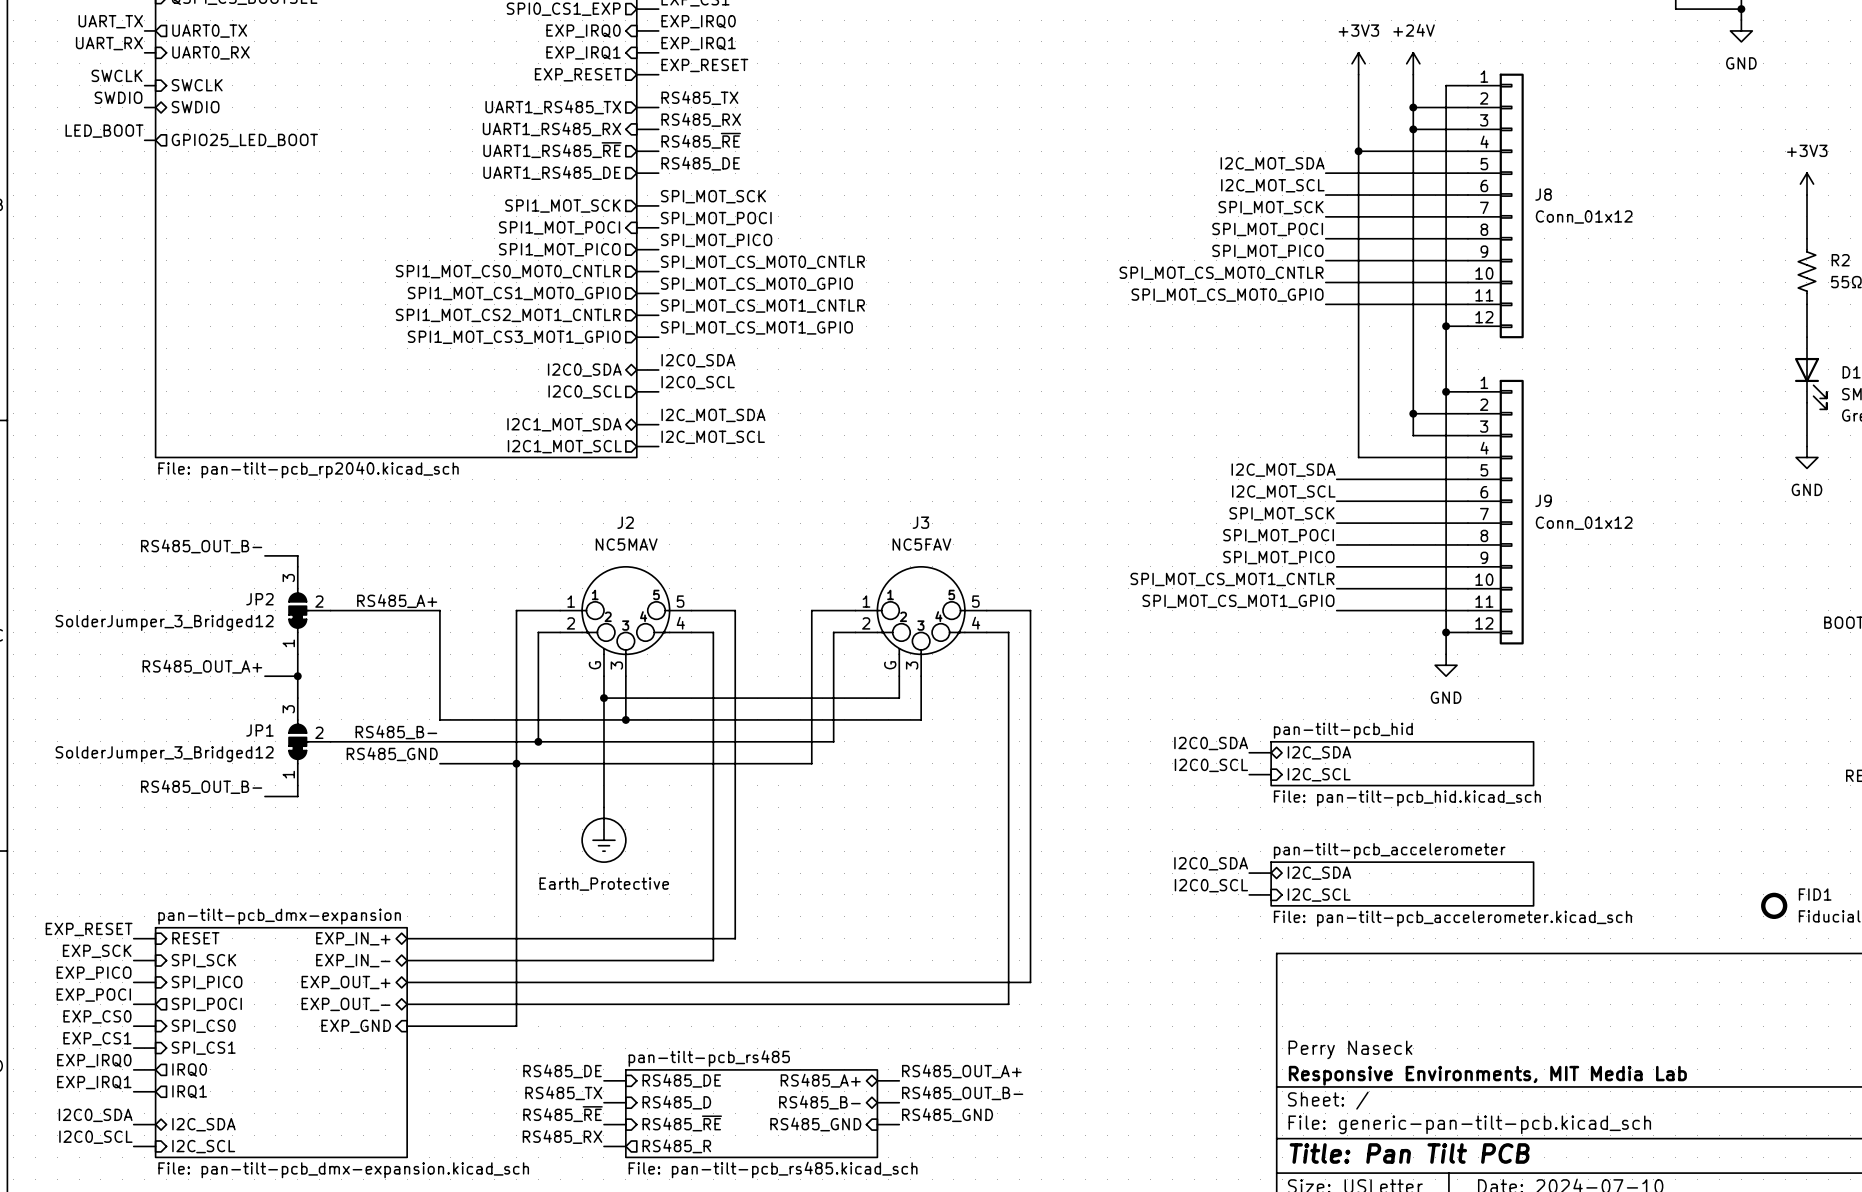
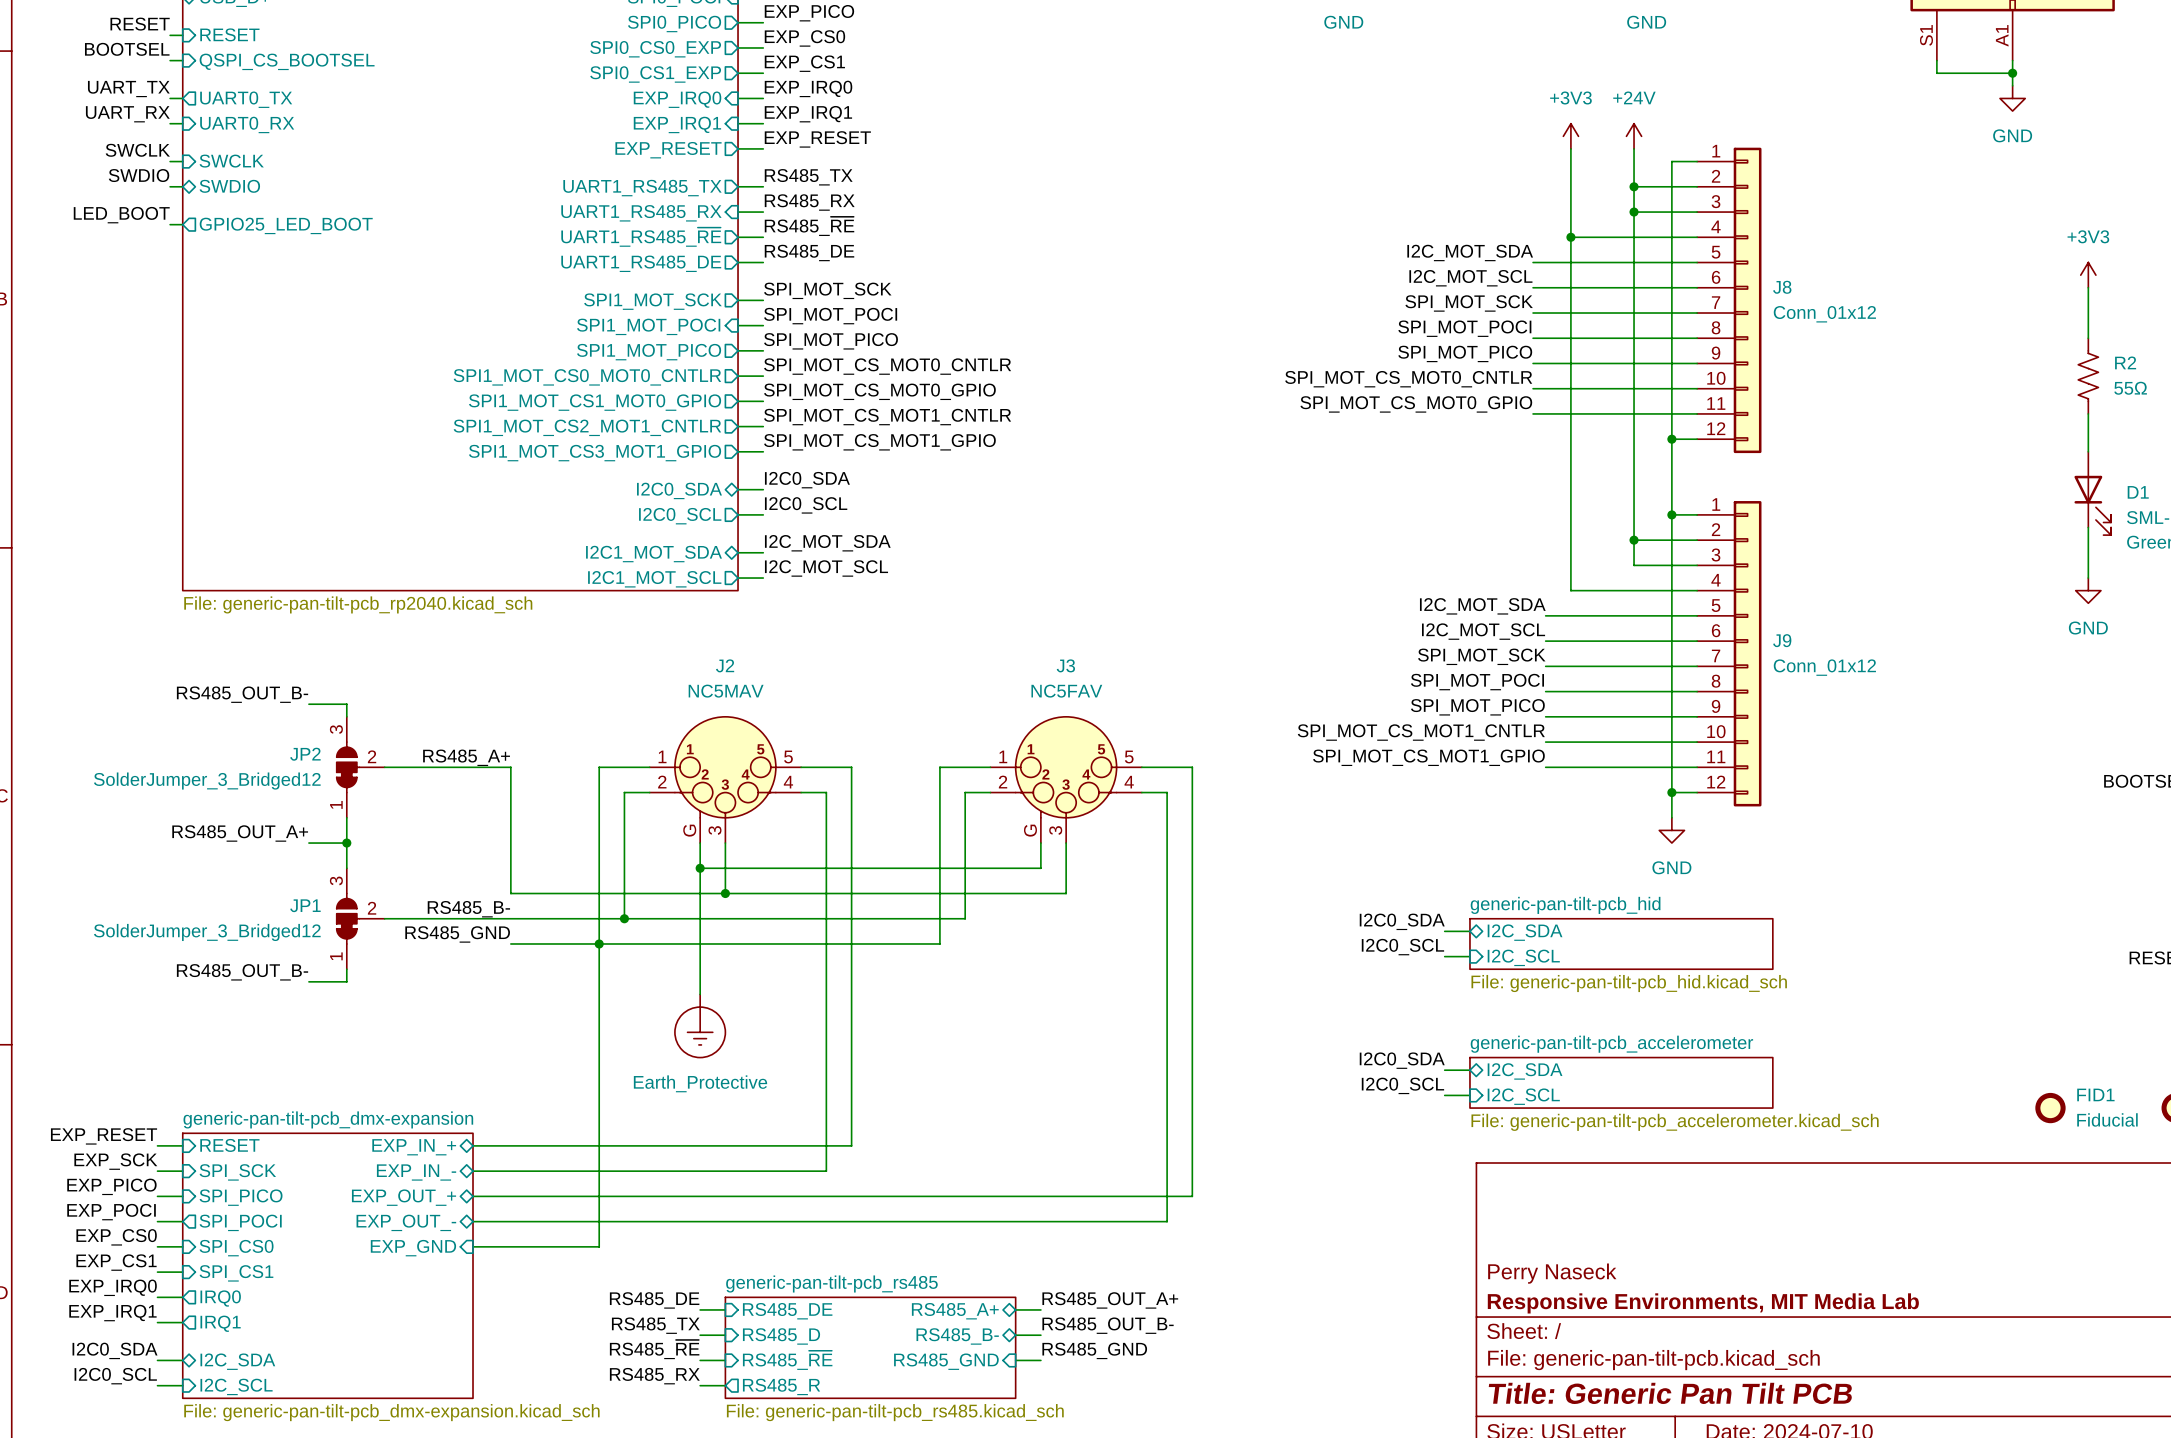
sheet value: File: pan-tilt-pcb_rp2040.kicad_sch (308, 470) -> File: generic-pan-tilt-pcb_rp2040.kicad_sch (358, 604)
sheet pan-tilt-pcb_hid name: pan-tilt-pcb_hid (1343, 730) -> generic-pan-tilt-pcb_hid (1565, 905)
sheet pan-tilt-pcb_hid value: File: pan-tilt-pcb_hid.kicad_sch (1407, 798) -> File: generic-pan-tilt-pcb_hid.kicad_sch (1629, 983)
sheet pan-tilt-pcb_accelerometer name: pan-tilt-pcb_accelerometer (1389, 851) -> generic-pan-tilt-pcb_accelerometer (1611, 1044)
sheet pan-tilt-pcb_dmx-expansion name: pan-tilt-pcb_dmx-expansion (279, 916) -> generic-pan-tilt-pcb_dmx-expansion (328, 1119)
sheet pan-tilt-pcb_accelerometer value: File: pan-tilt-pcb_accelerometer.kicad_sch (1452, 918) -> File: generic-pan-tilt-pcb_accelerometer.kicad_sch (1675, 1122)
sheet pan-tilt-pcb_rs485 name: pan-tilt-pcb_rs485 (709, 1058) -> generic-pan-tilt-pcb_rs485 (831, 1283)
title block: Title: Pan Tilt PCB (1409, 1153) -> Title: Generic Pan Tilt PCB (1670, 1393)
sheet pan-tilt-pcb_rs485 value: File: pan-tilt-pcb_rs485.kicad_sch (773, 1169) -> File: generic-pan-tilt-pcb_rs485.kicad_sch (895, 1412)
sheet pan-tilt-pcb_dmx-expansion value: File: pan-tilt-pcb_dmx-expansion.kicad_sch (343, 1170) -> File: generic-pan-tilt-pcb_dmx-expansion.kicad_sch (391, 1412)

